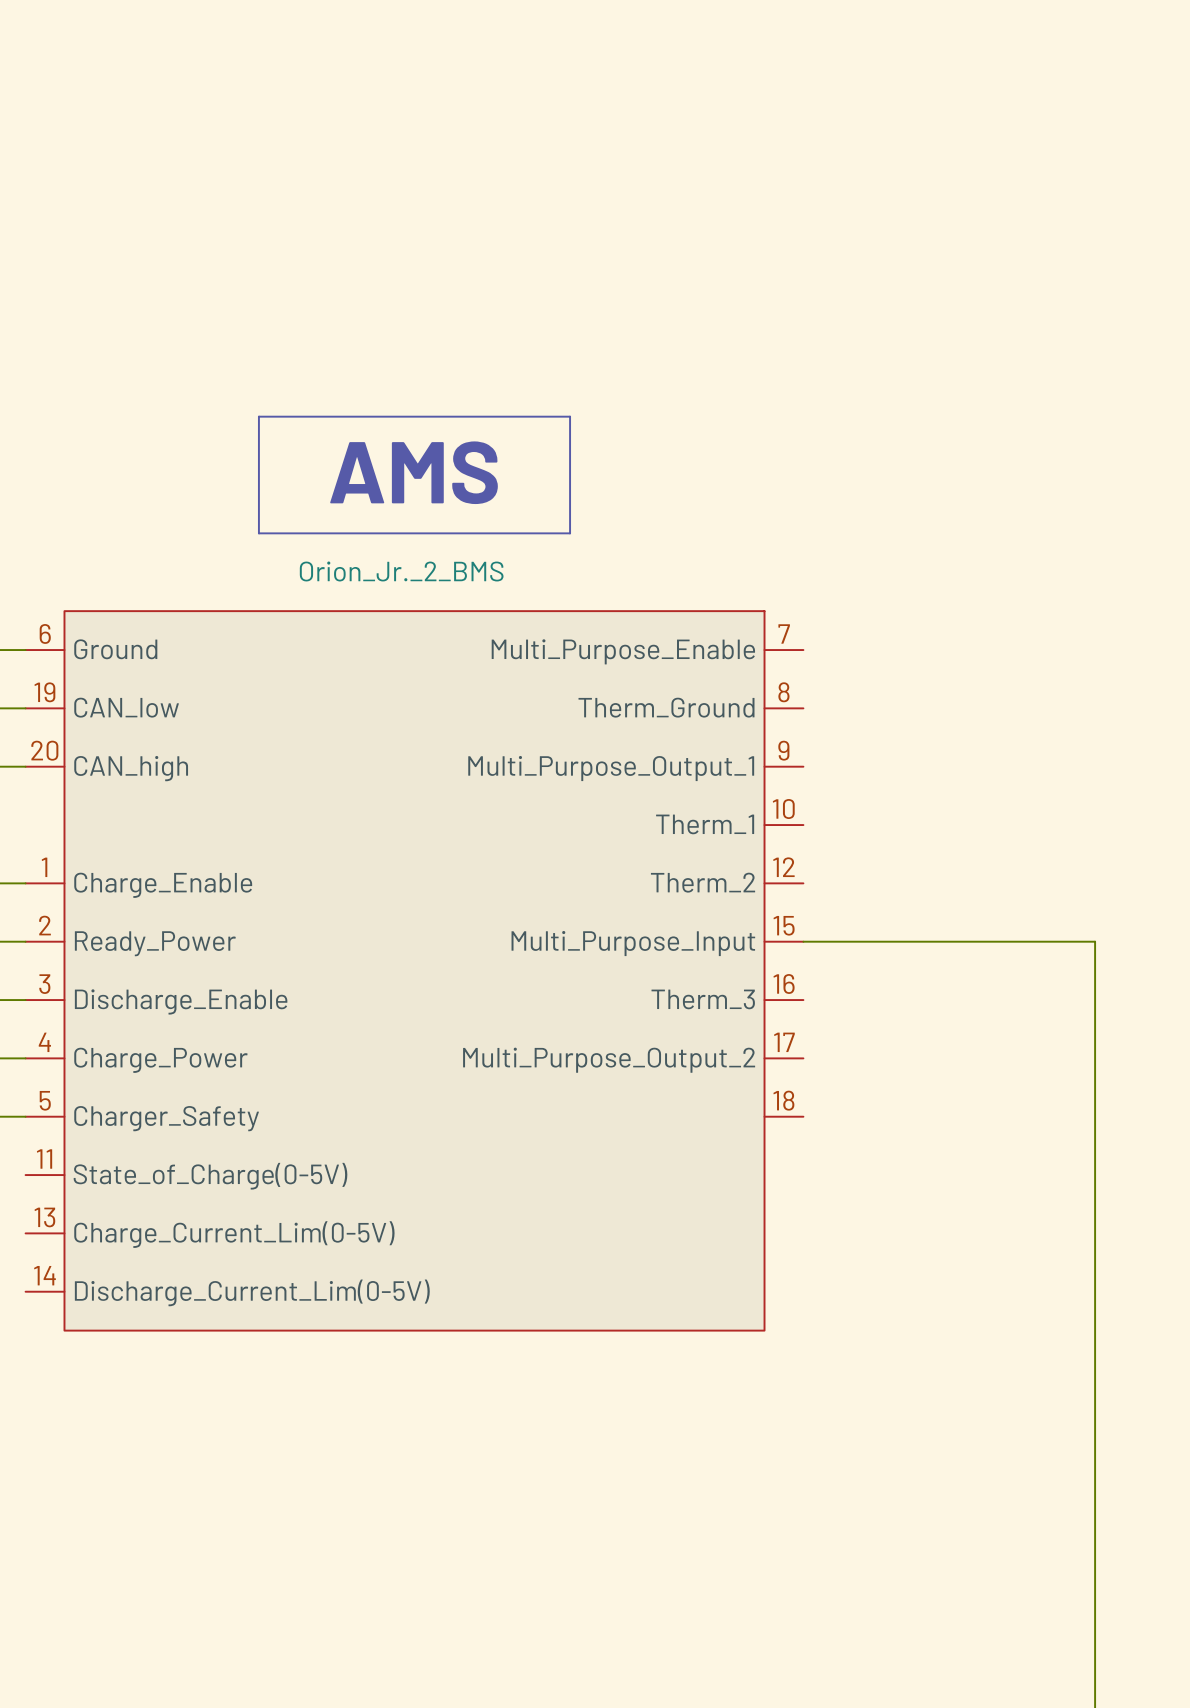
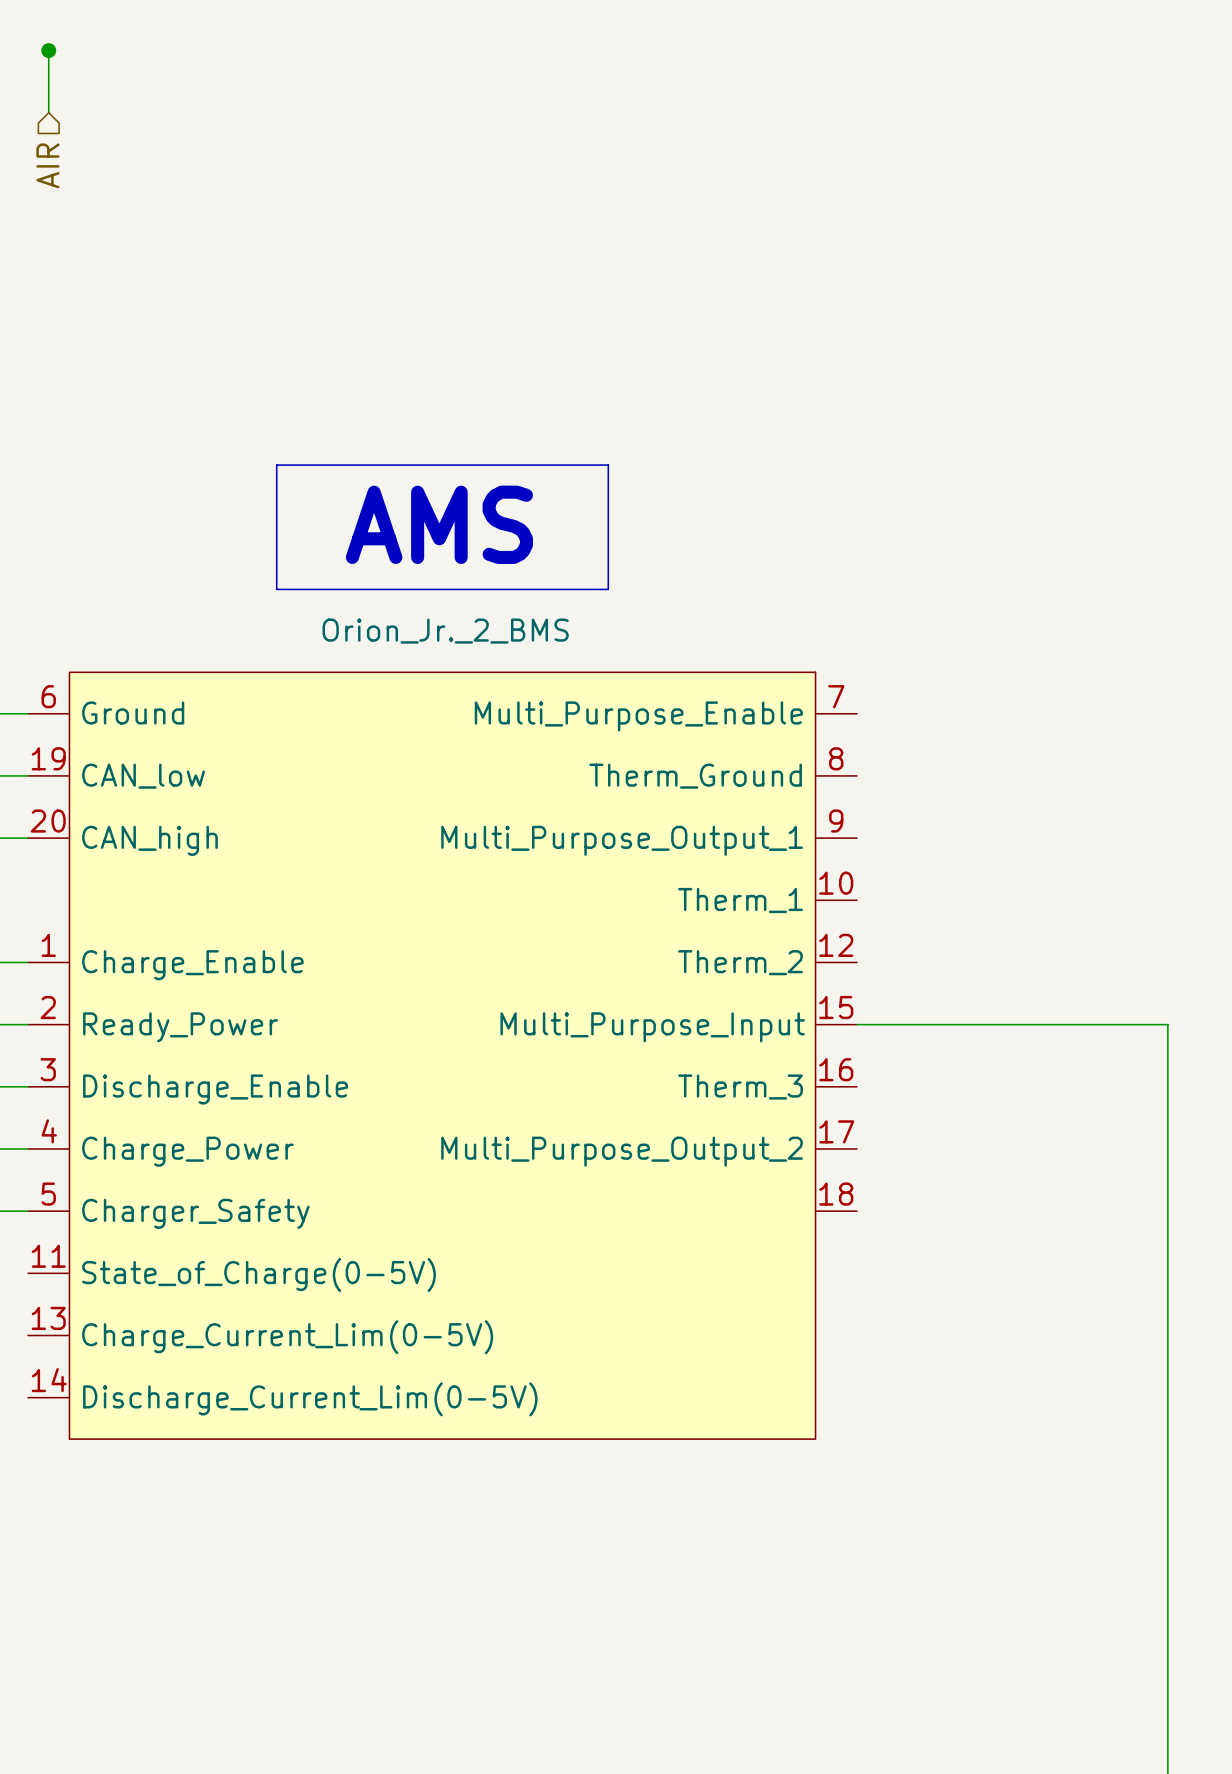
wire: none -> (48, 50) (48, 112)
junction: none -> (48, 50)
hierarchical label: none -> AIR (47, 165)

